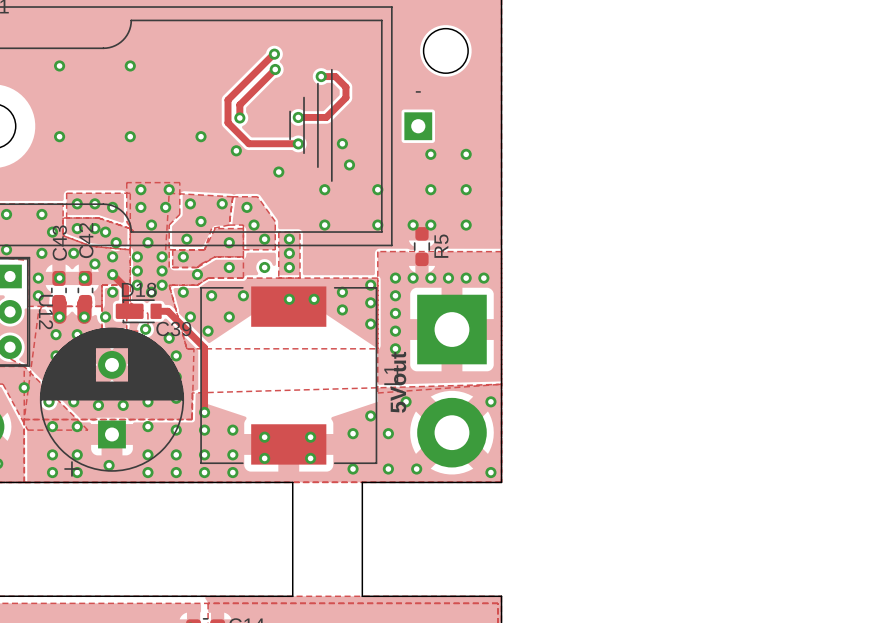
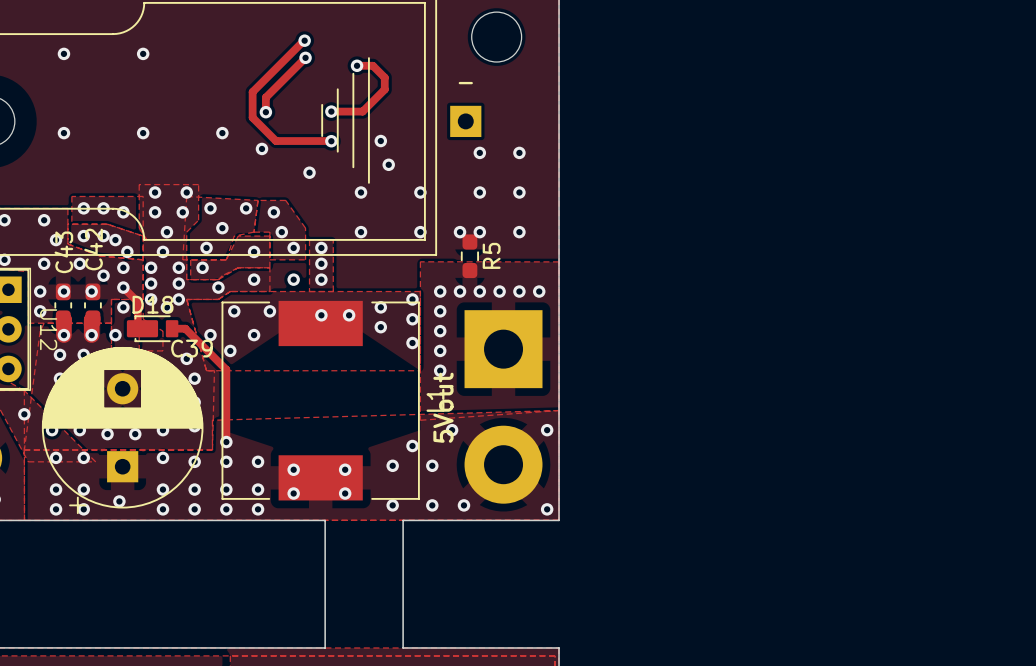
via: (183, 292) -> none
via: (145, 329) -> none

